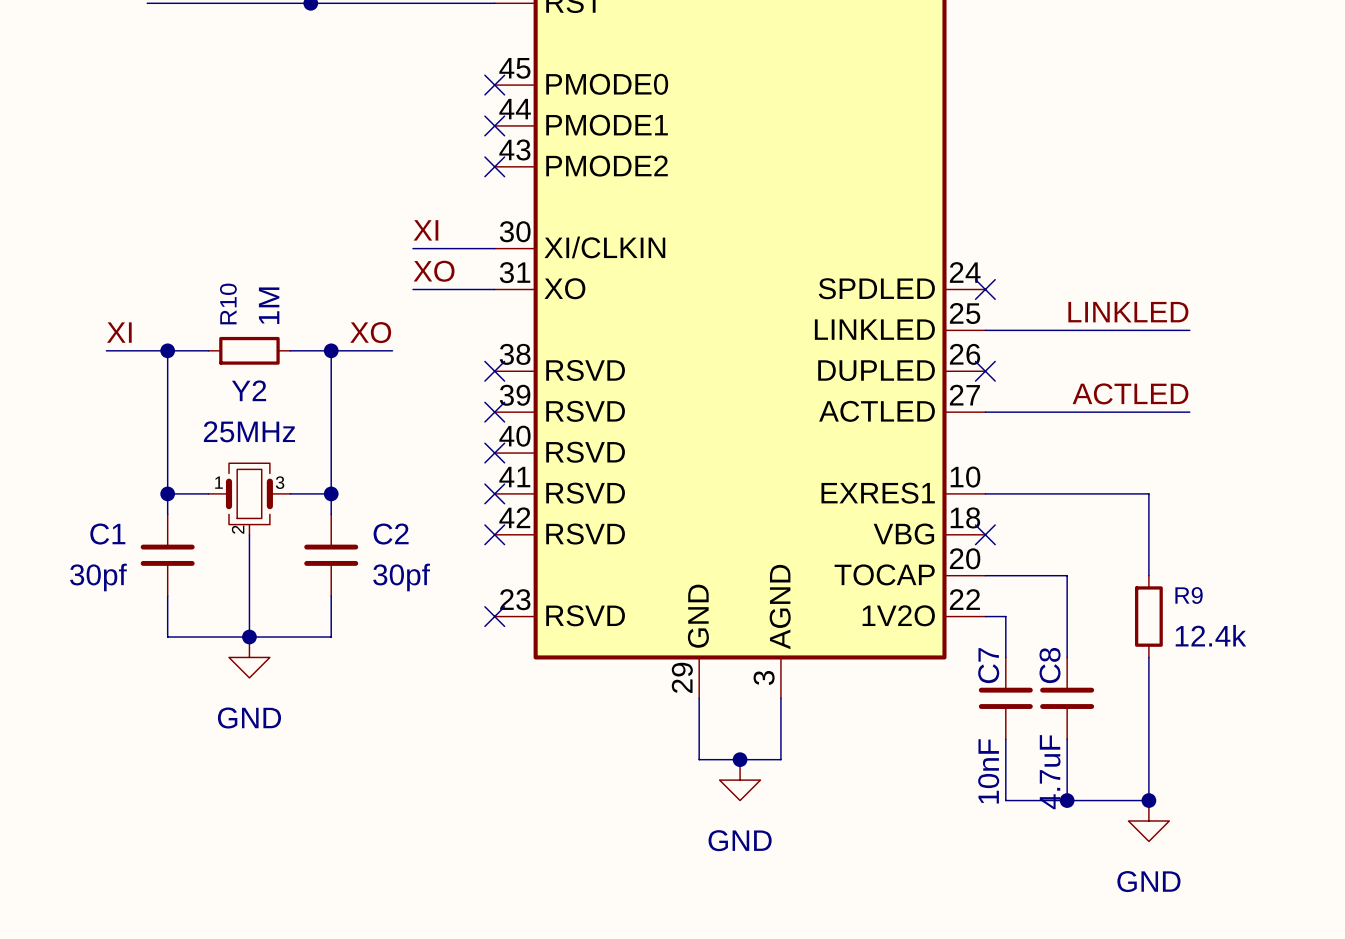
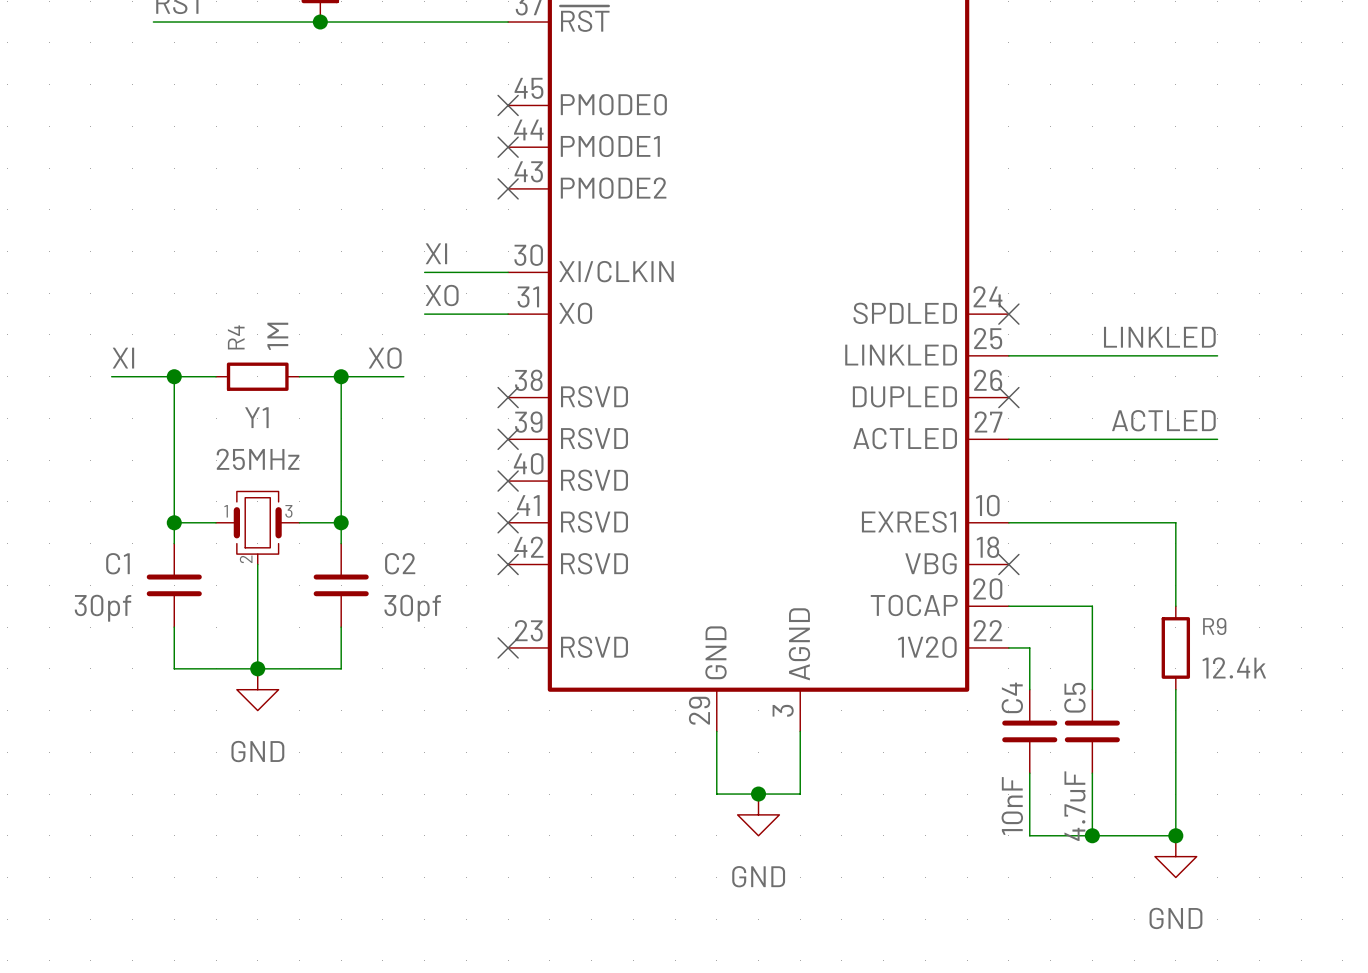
R10 name: R10 (228, 303) -> R4 (236, 337)
Y2 name: Y2 (249, 390) -> Y1 (256, 417)
C7 name: C7 (988, 665) -> C4 (1012, 697)
C8 name: C8 (1050, 665) -> C5 (1074, 697)

